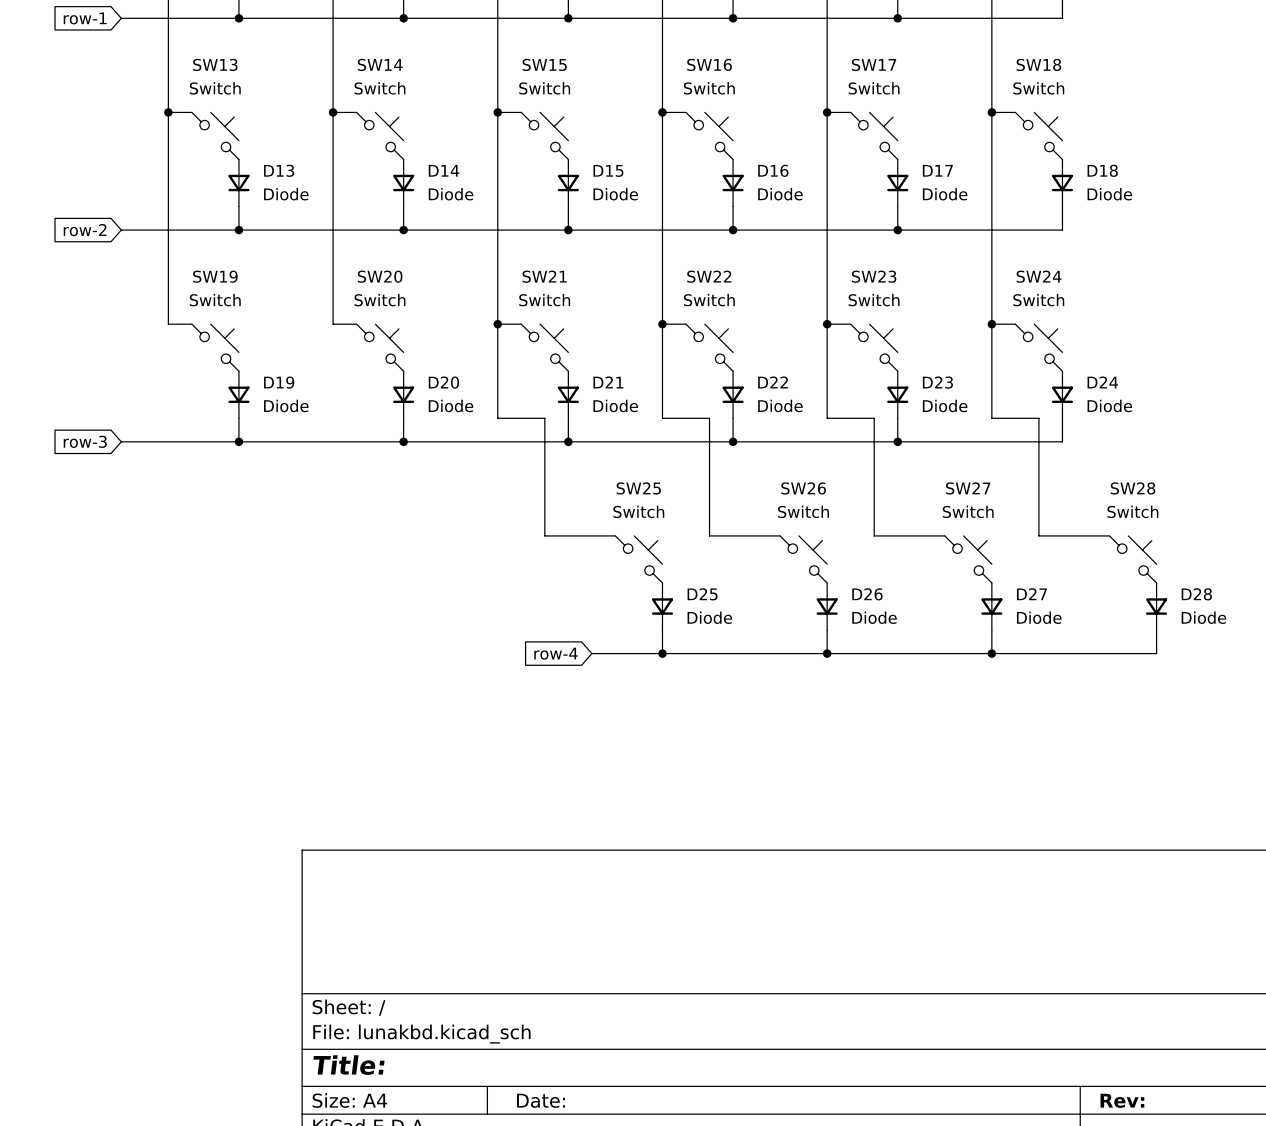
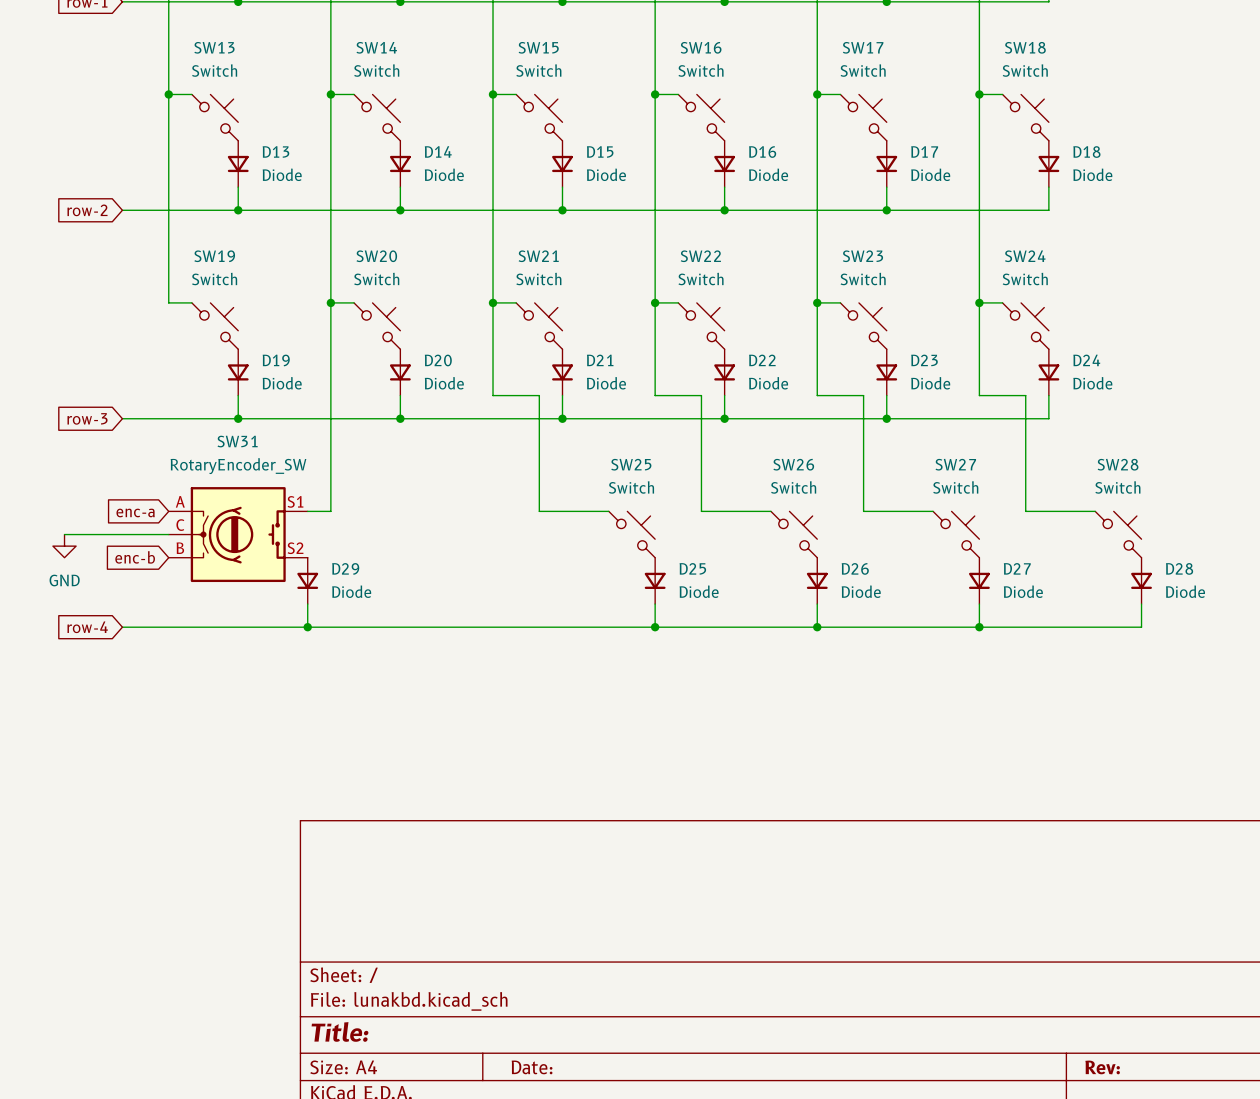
wire: none -> (330, 302) (330, 511) (307, 511)
junction: none -> (330, 302)
global label: none -> enc-a (135, 512)
wire: none -> (64, 534) (168, 534)
SW31: none -> RotaryEncoder_SW (238, 534)
power symbol: none -> GND (64, 546)
global label: none -> enc-b (135, 557)
D29: none -> Diode (307, 580)
wire: none -> (307, 604) (307, 627)
global label: none -> row-4 (87, 627)
wire: none -> (122, 627) (585, 627)
junction: none -> (307, 627)
global label: row-4 (556, 653) -> none

